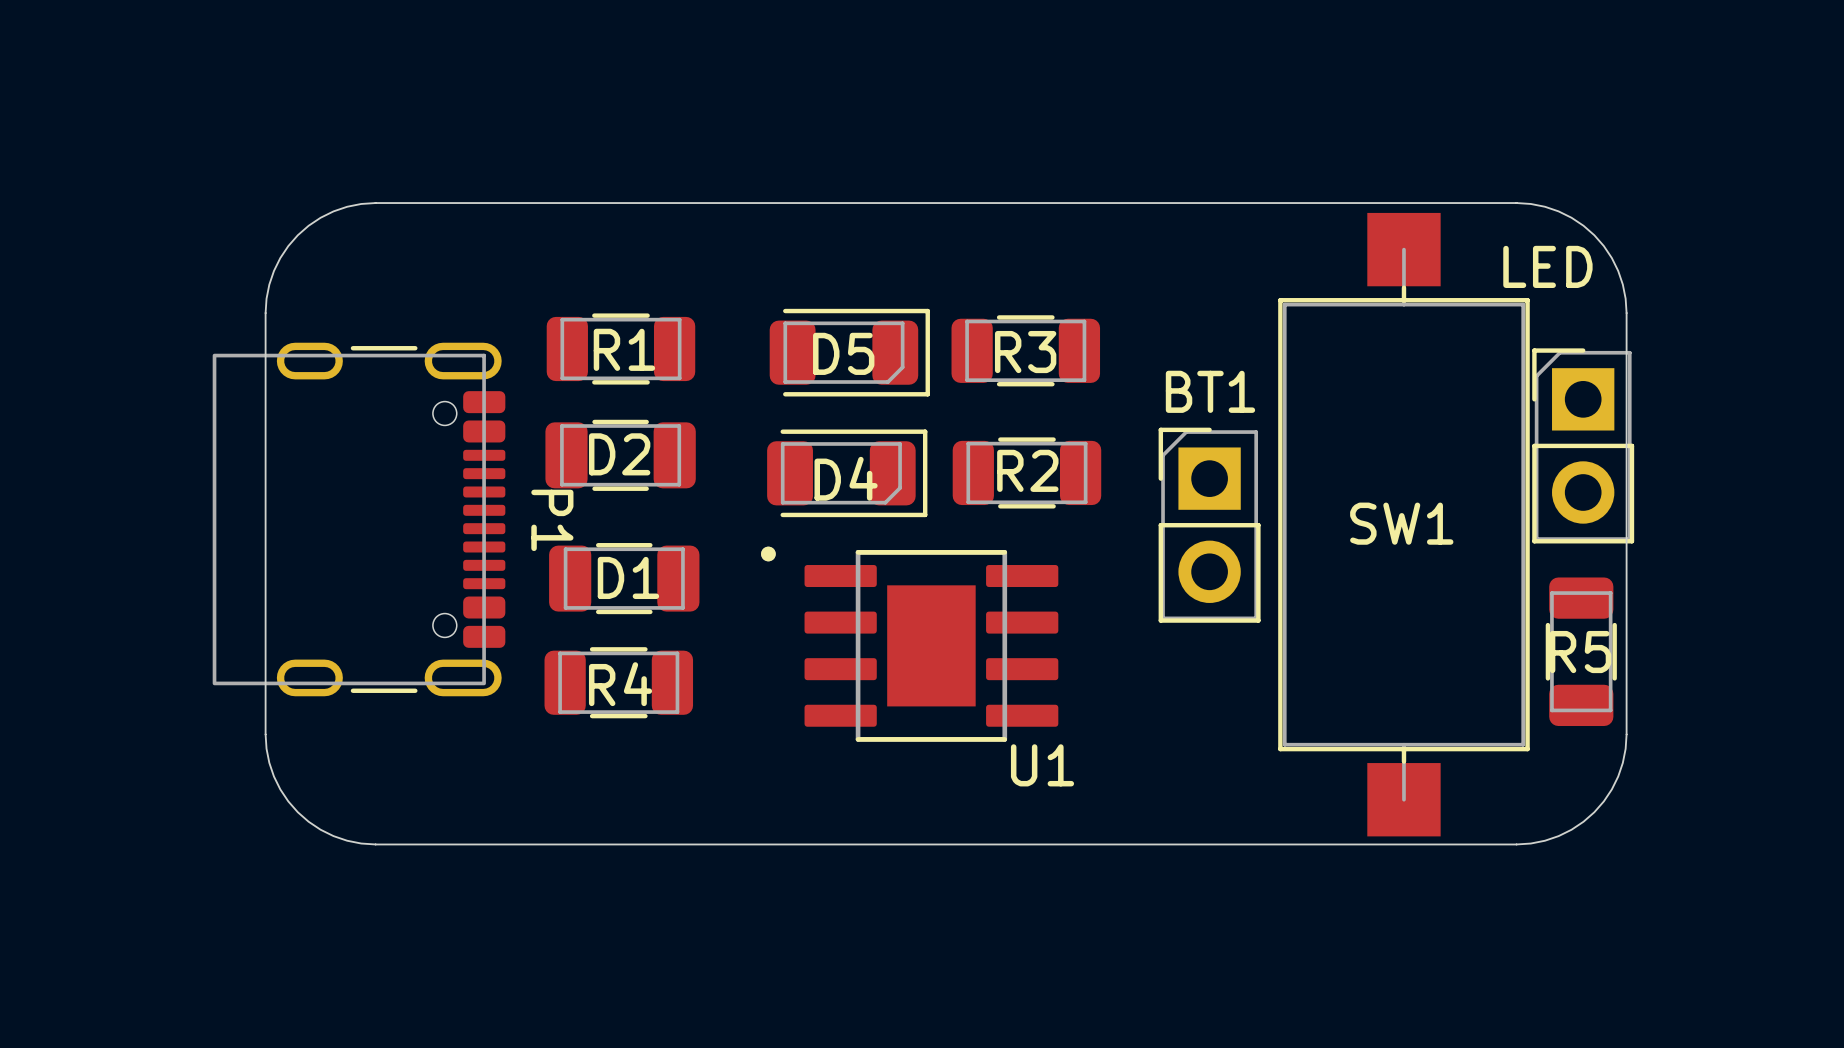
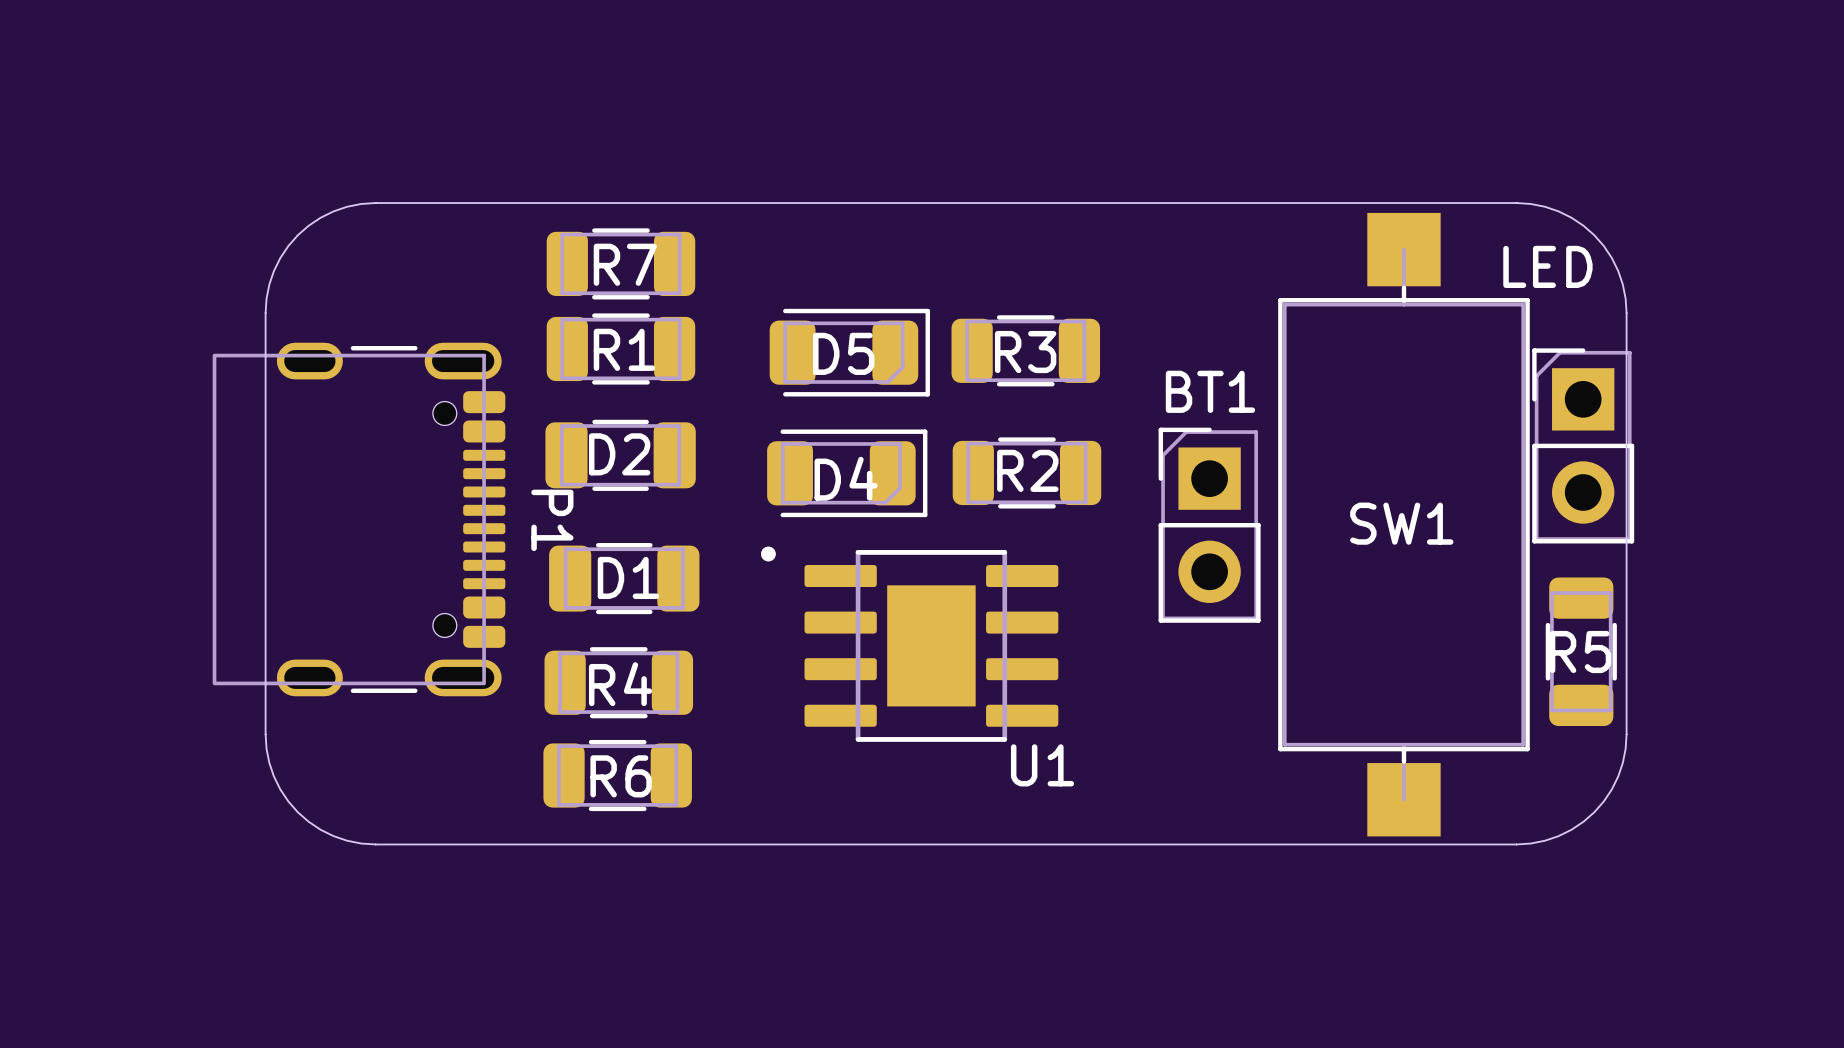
R7: none -> (620, 263)
R6: none -> (617, 775)

